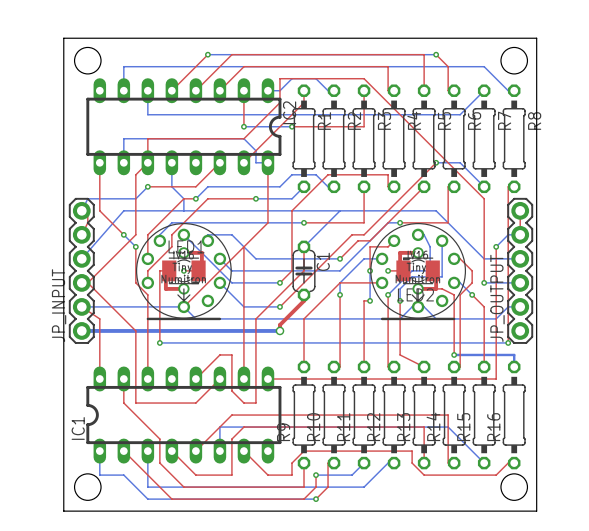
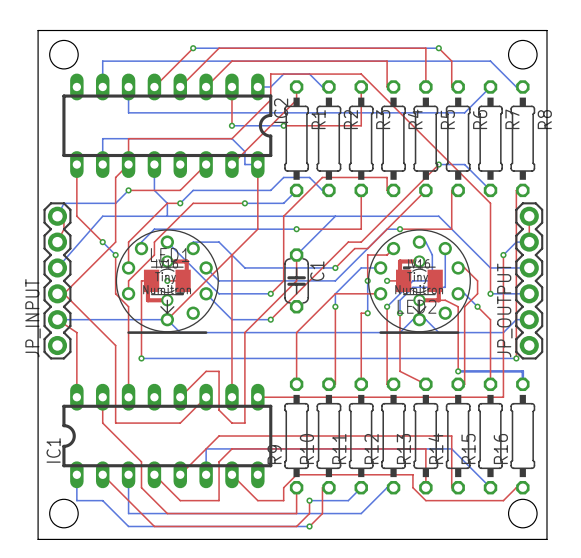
top track: (304, 294) (304, 300) (279, 324) (279, 330) -> none
bottom track: (81, 330) (279, 330) -> none
via: (279, 330) -> none

